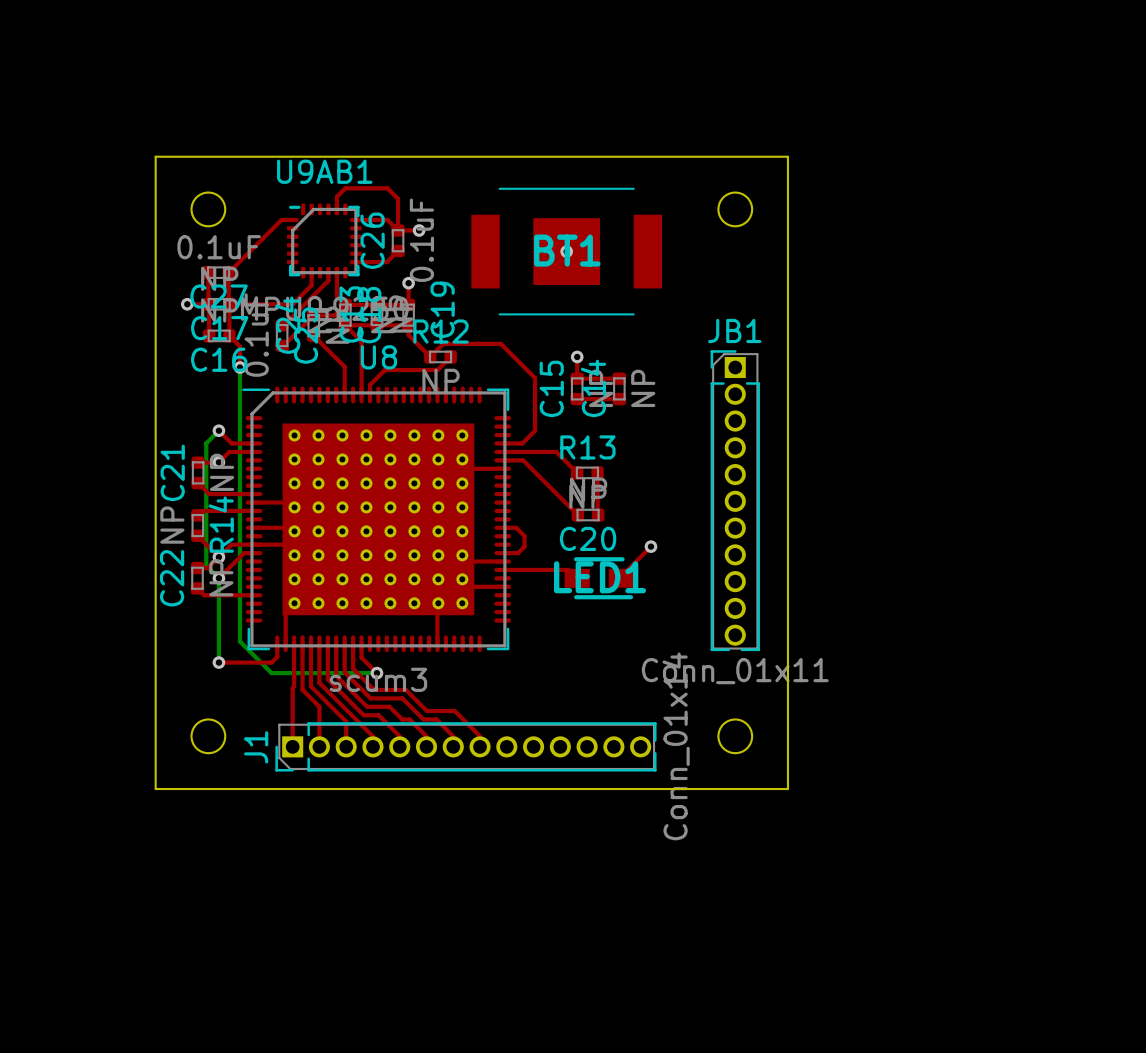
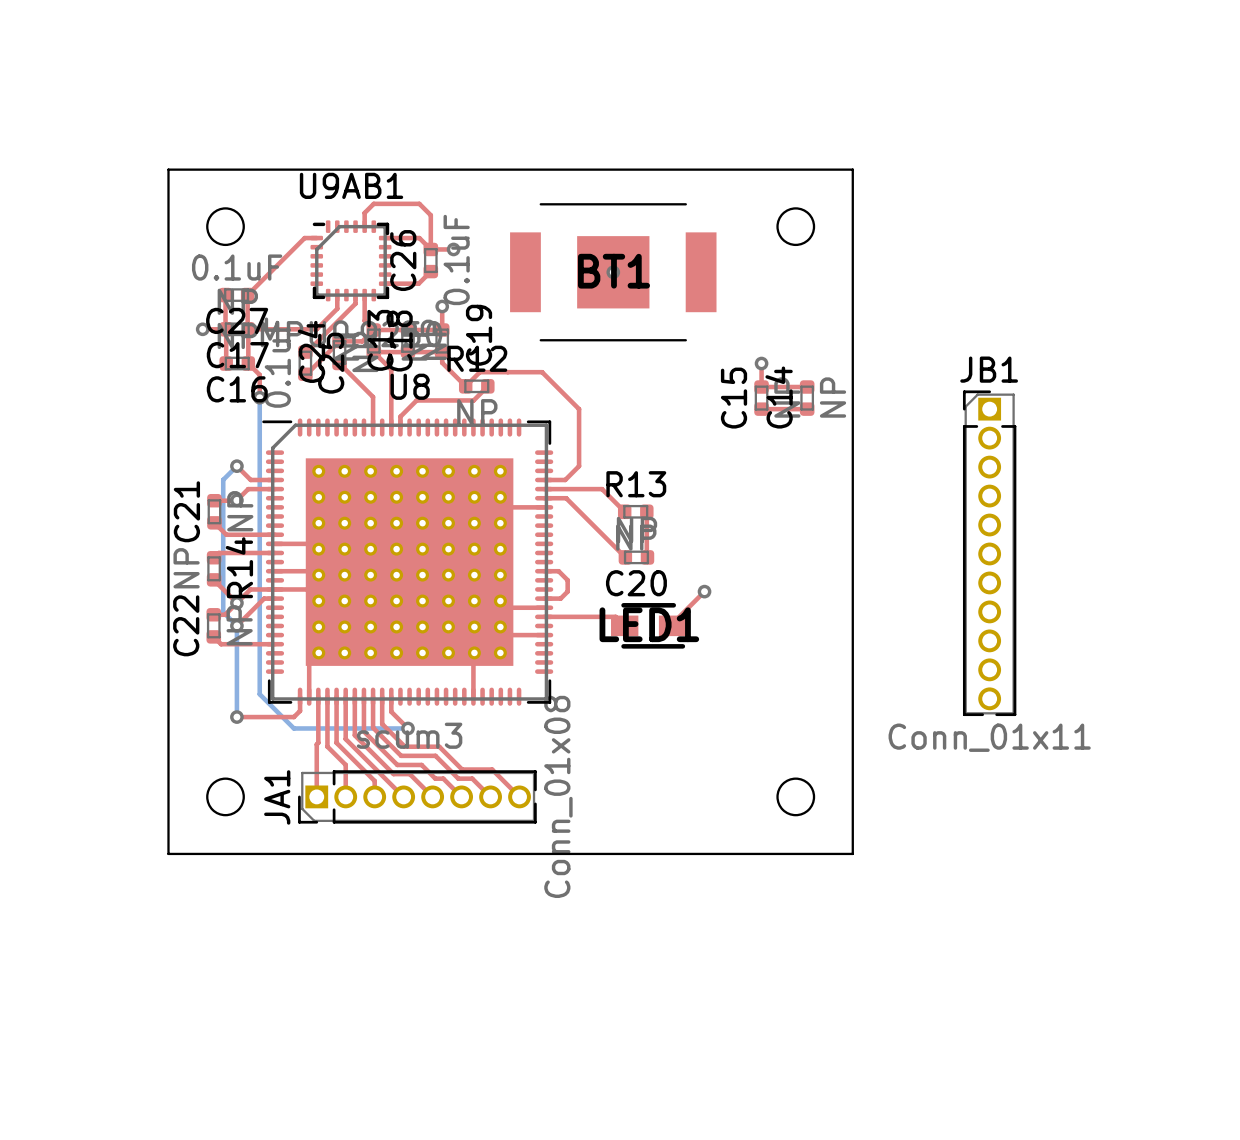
via: none -> (761, 363)
top track: (577, 356) (577, 378) (619, 378) -> (761, 363) (761, 387) (807, 387)
via: (577, 356) -> none
C15 position: (577, 388) -> (761, 398)
C14 position: (619, 388) -> (807, 398)
top track: (577, 399) (619, 399) -> (761, 409) (807, 409)
JB1 position: (735, 500) -> (989, 553)
JA1: none -> Conn_01x08 (417, 796)
J1: Conn_01x14 (465, 746) -> none

